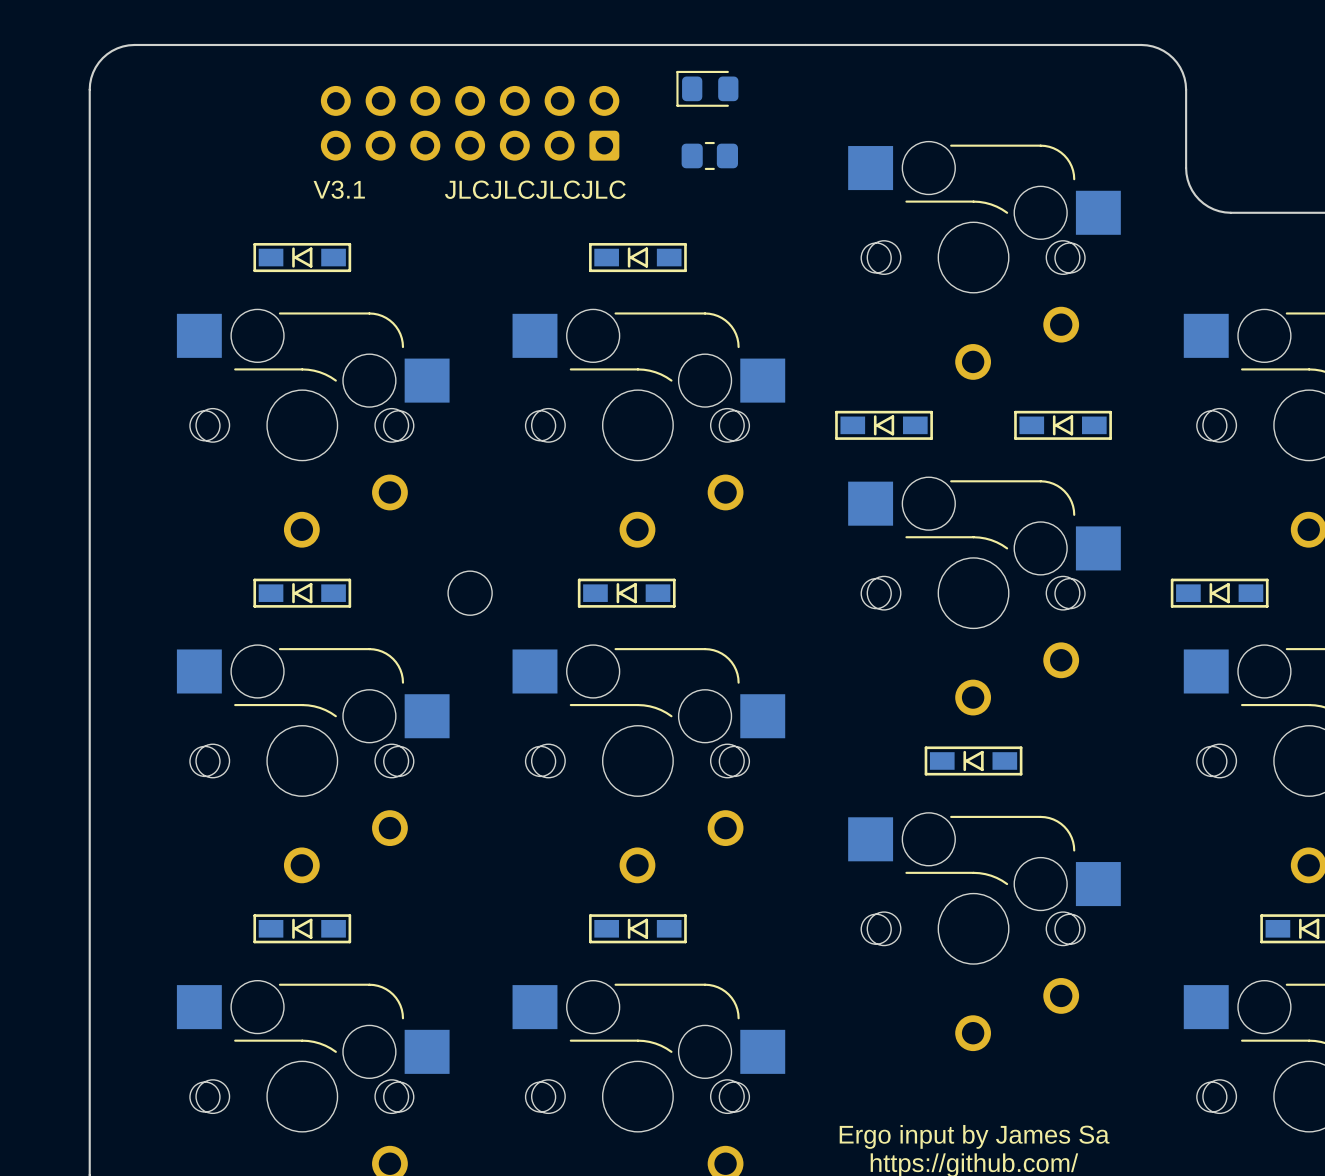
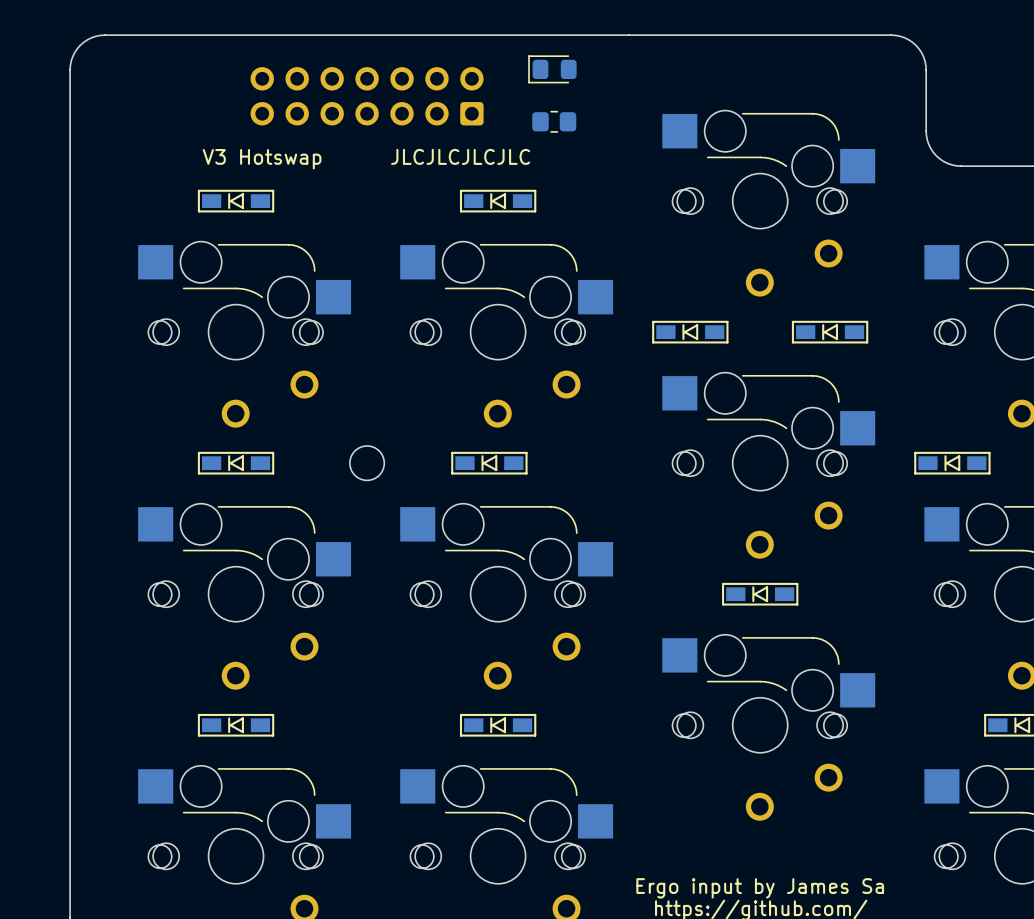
text: V3.1 (339, 189) -> none
text position: JLCJLCJLCJLC (535, 189) -> JLCJLCJLCJLC (460, 156)
text: none -> V3 Hotswap (262, 159)

